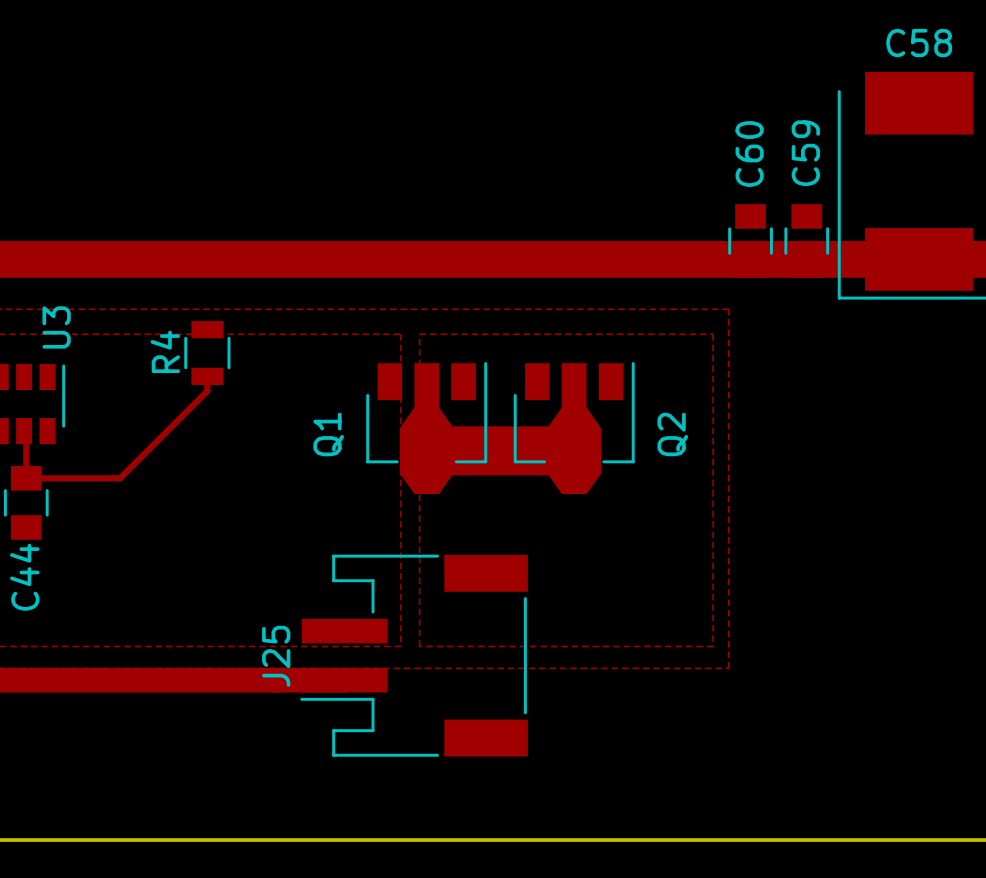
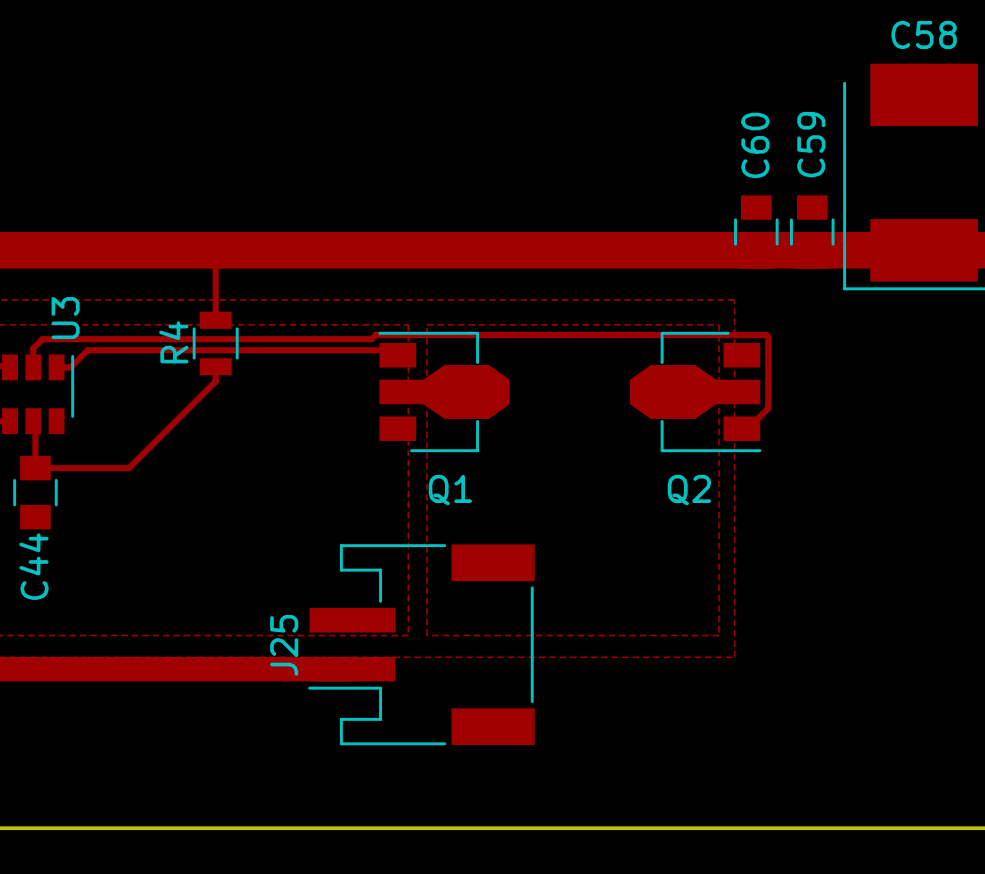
track: none -> (214, 250) (215, 320)
track: none -> (397, 355) (391, 355) (386, 350) (87, 350) (70, 367) (56, 367)
track: none -> (33, 367) (33, 348) (42, 339) (371, 339) (375, 335) (766, 335) (768, 336) (768, 408) (747, 428) (741, 428)
Q1 rotation: 0° (426, 428) -> 90° counterclockwise (443, 391)
Q2 rotation: 0° (574, 428) -> 90° clockwise (695, 391)
Q2 position: (574, 428) -> (695, 391)
track: (426, 450) (574, 450) -> none

